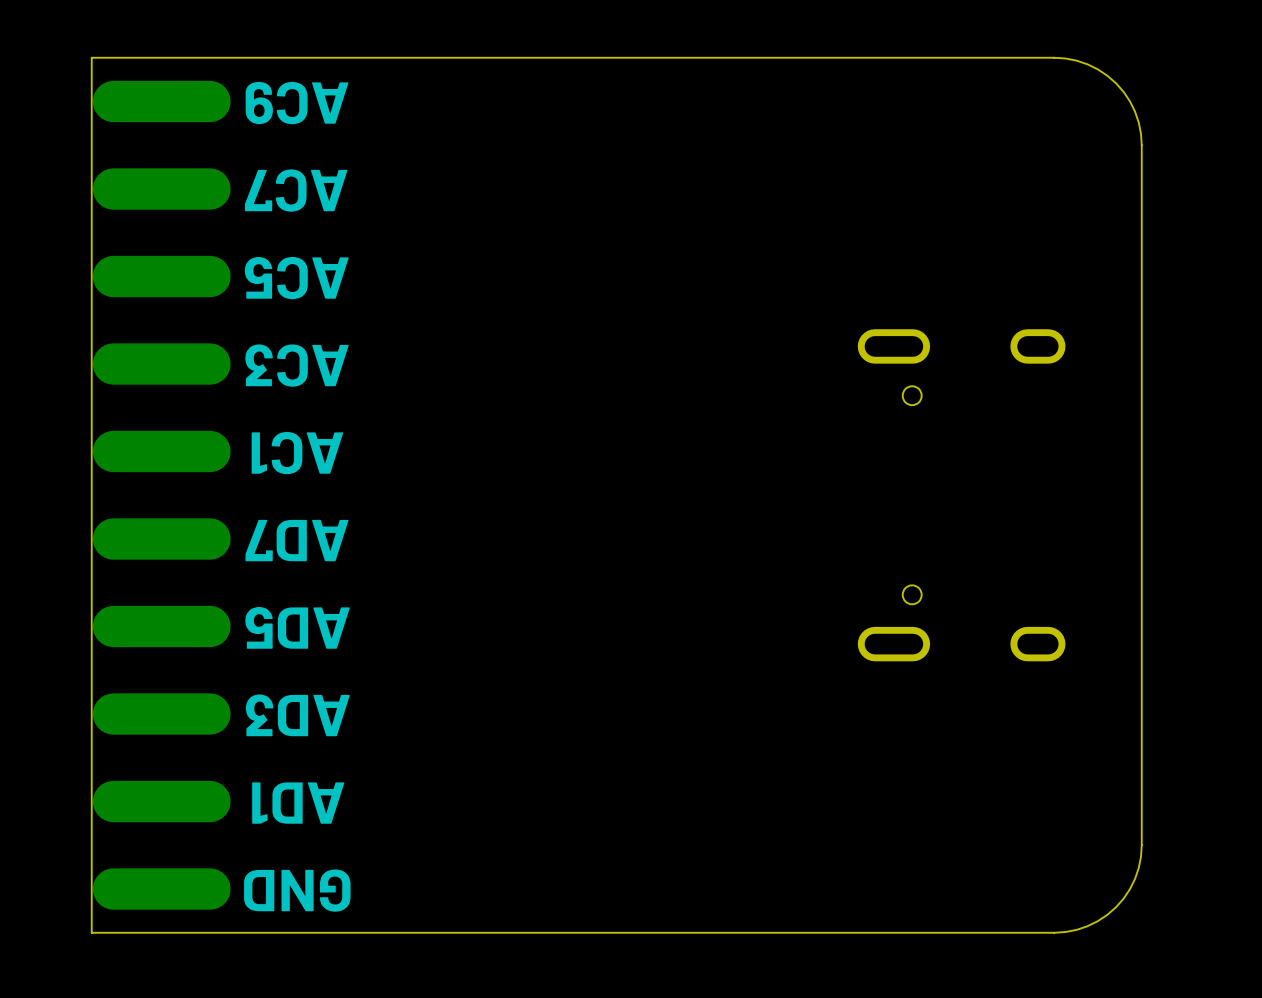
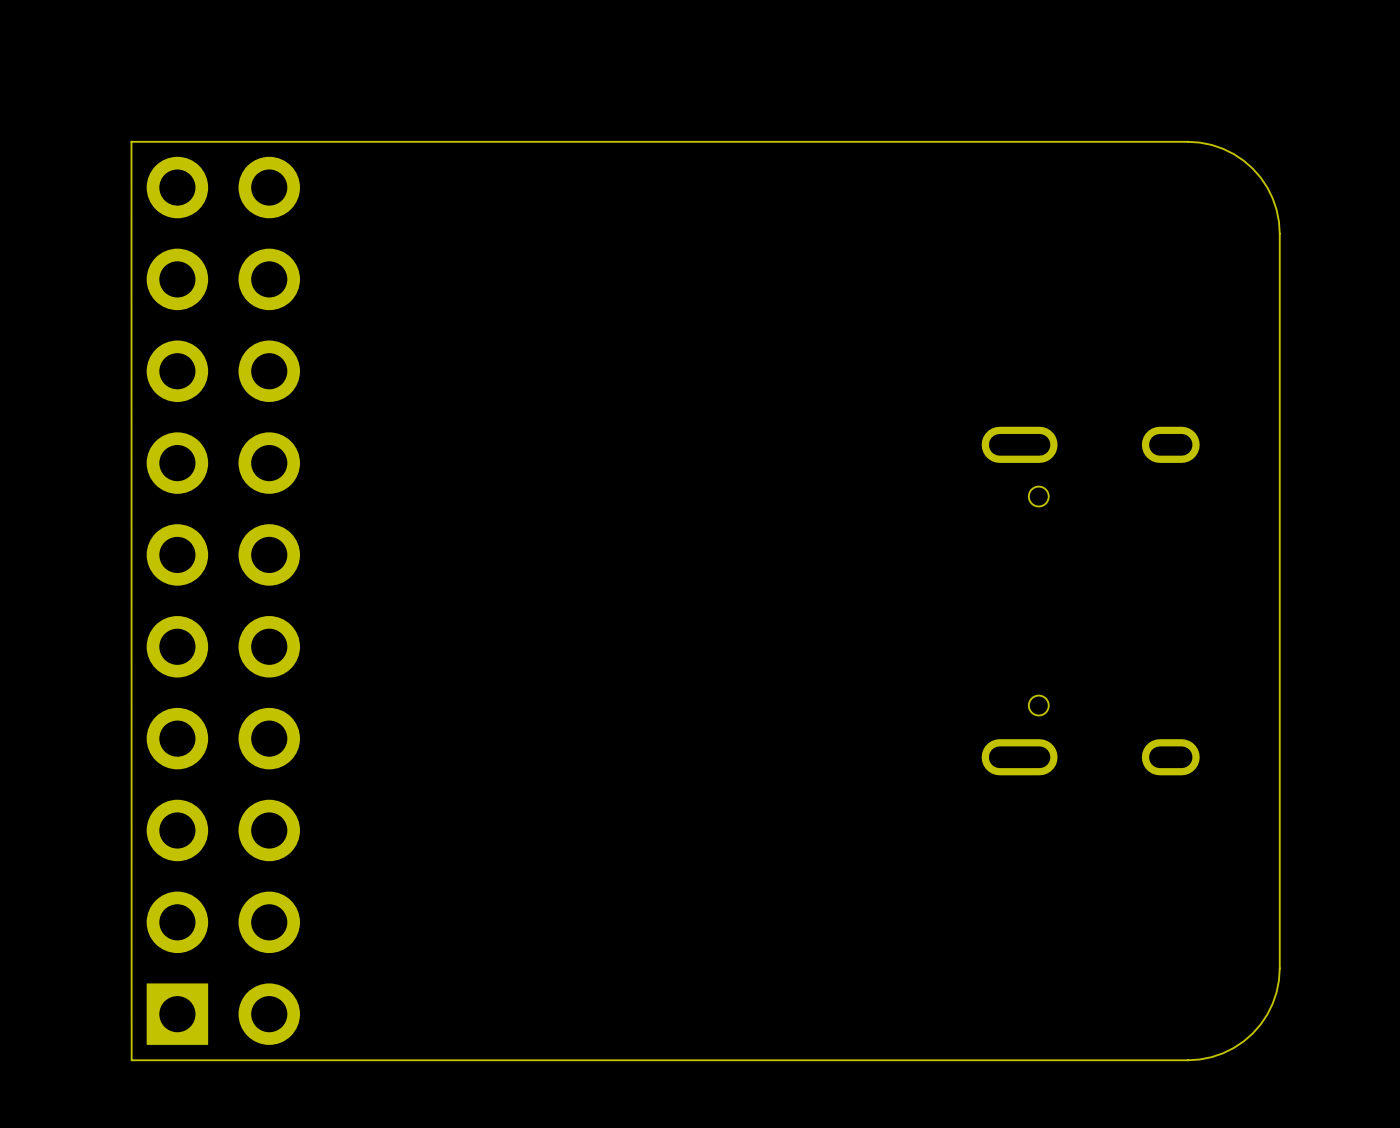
board edge: (91, 57) (91, 932) -> (131, 141) (131, 1060) (177, 1060)
board edge: none -> (177, 141) (131, 141)
part footprint: [92, 80, 231, 910] -> [146, 156, 300, 1045]
text: AC9 (297, 103) -> none
text: AC7 (296, 190) -> none
text: AC5 (296, 278) -> none
text: AC3 (297, 365) -> none
text: AC1 (297, 453) -> none
text: AD7 (297, 540) -> none
text: AD5 (297, 627) -> none
text: AD3 (297, 715) -> none
text: AD1 (298, 803) -> none
text: GND (297, 890) -> none

